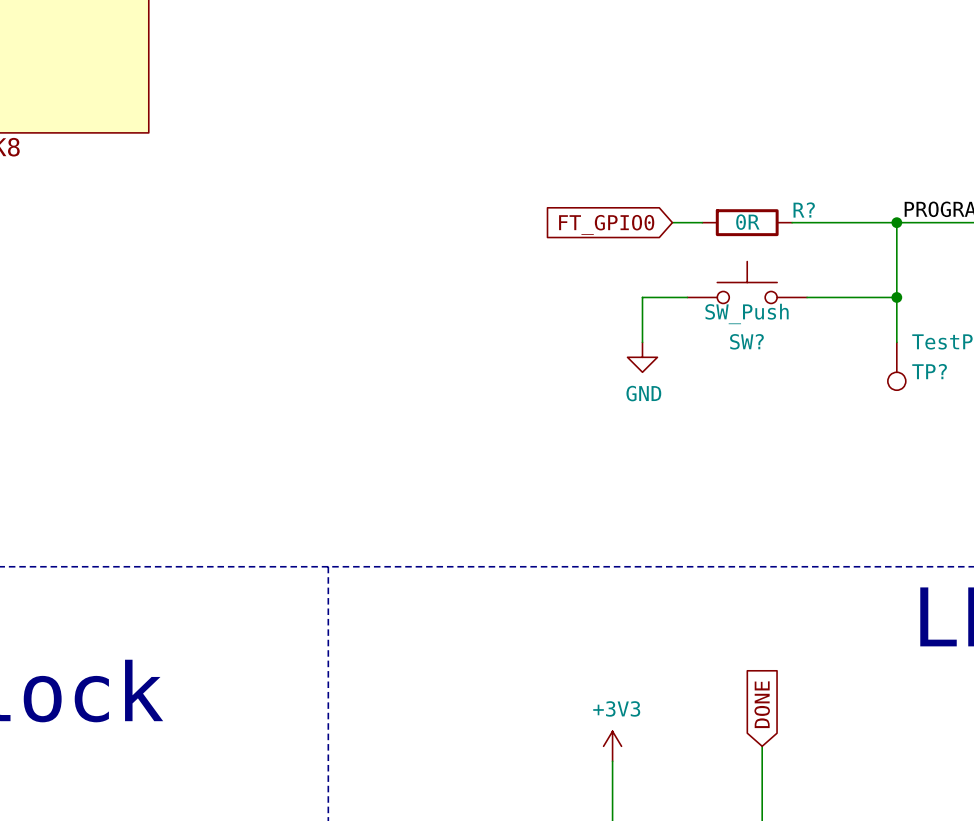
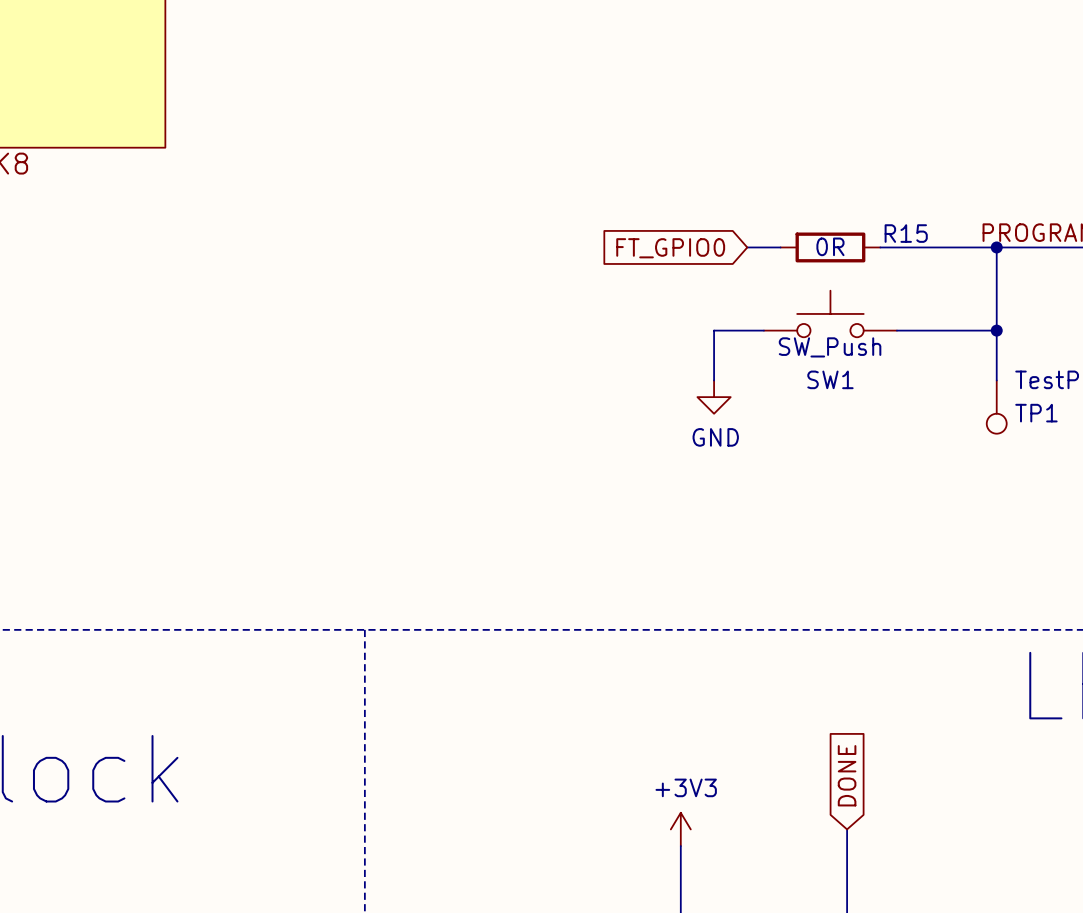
R? name: R? (804, 210) -> R15 (906, 233)
SW? name: SW? (746, 341) -> SW1 (830, 379)
TP? name: TP? (929, 371) -> TP1 (1036, 413)

